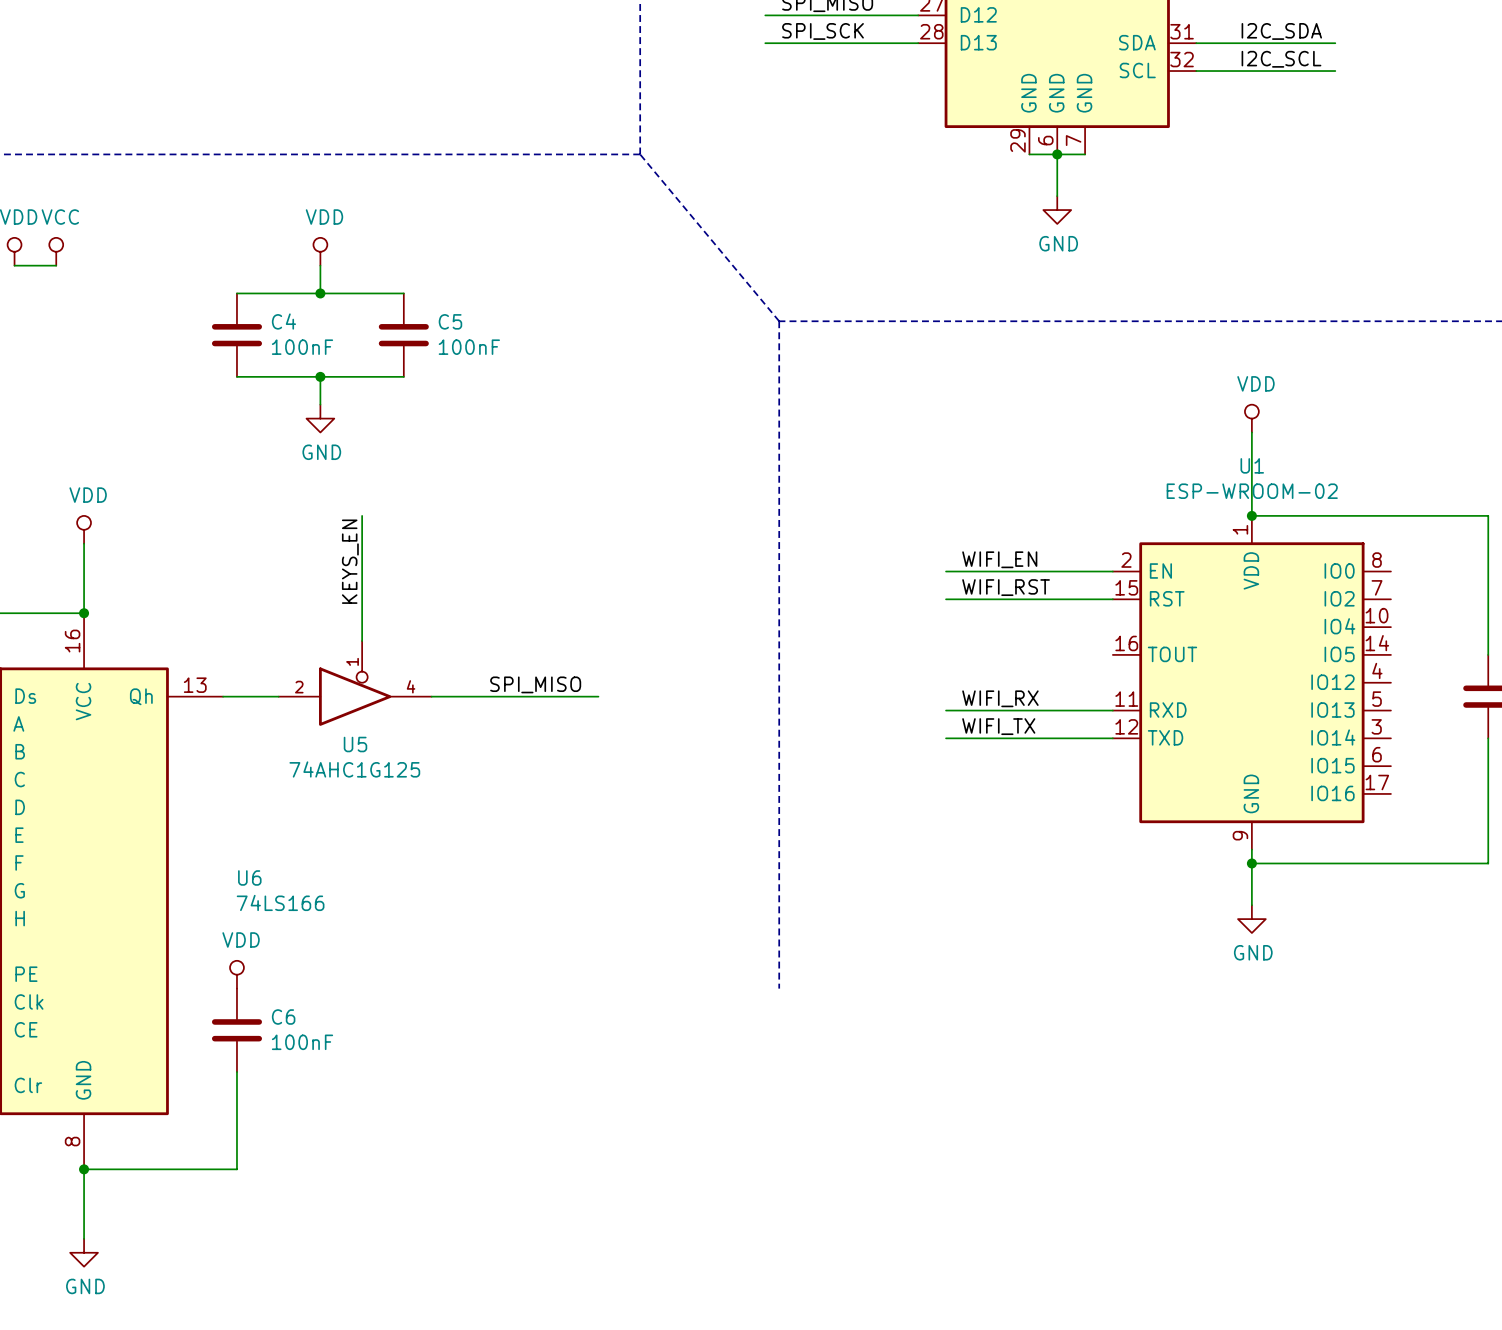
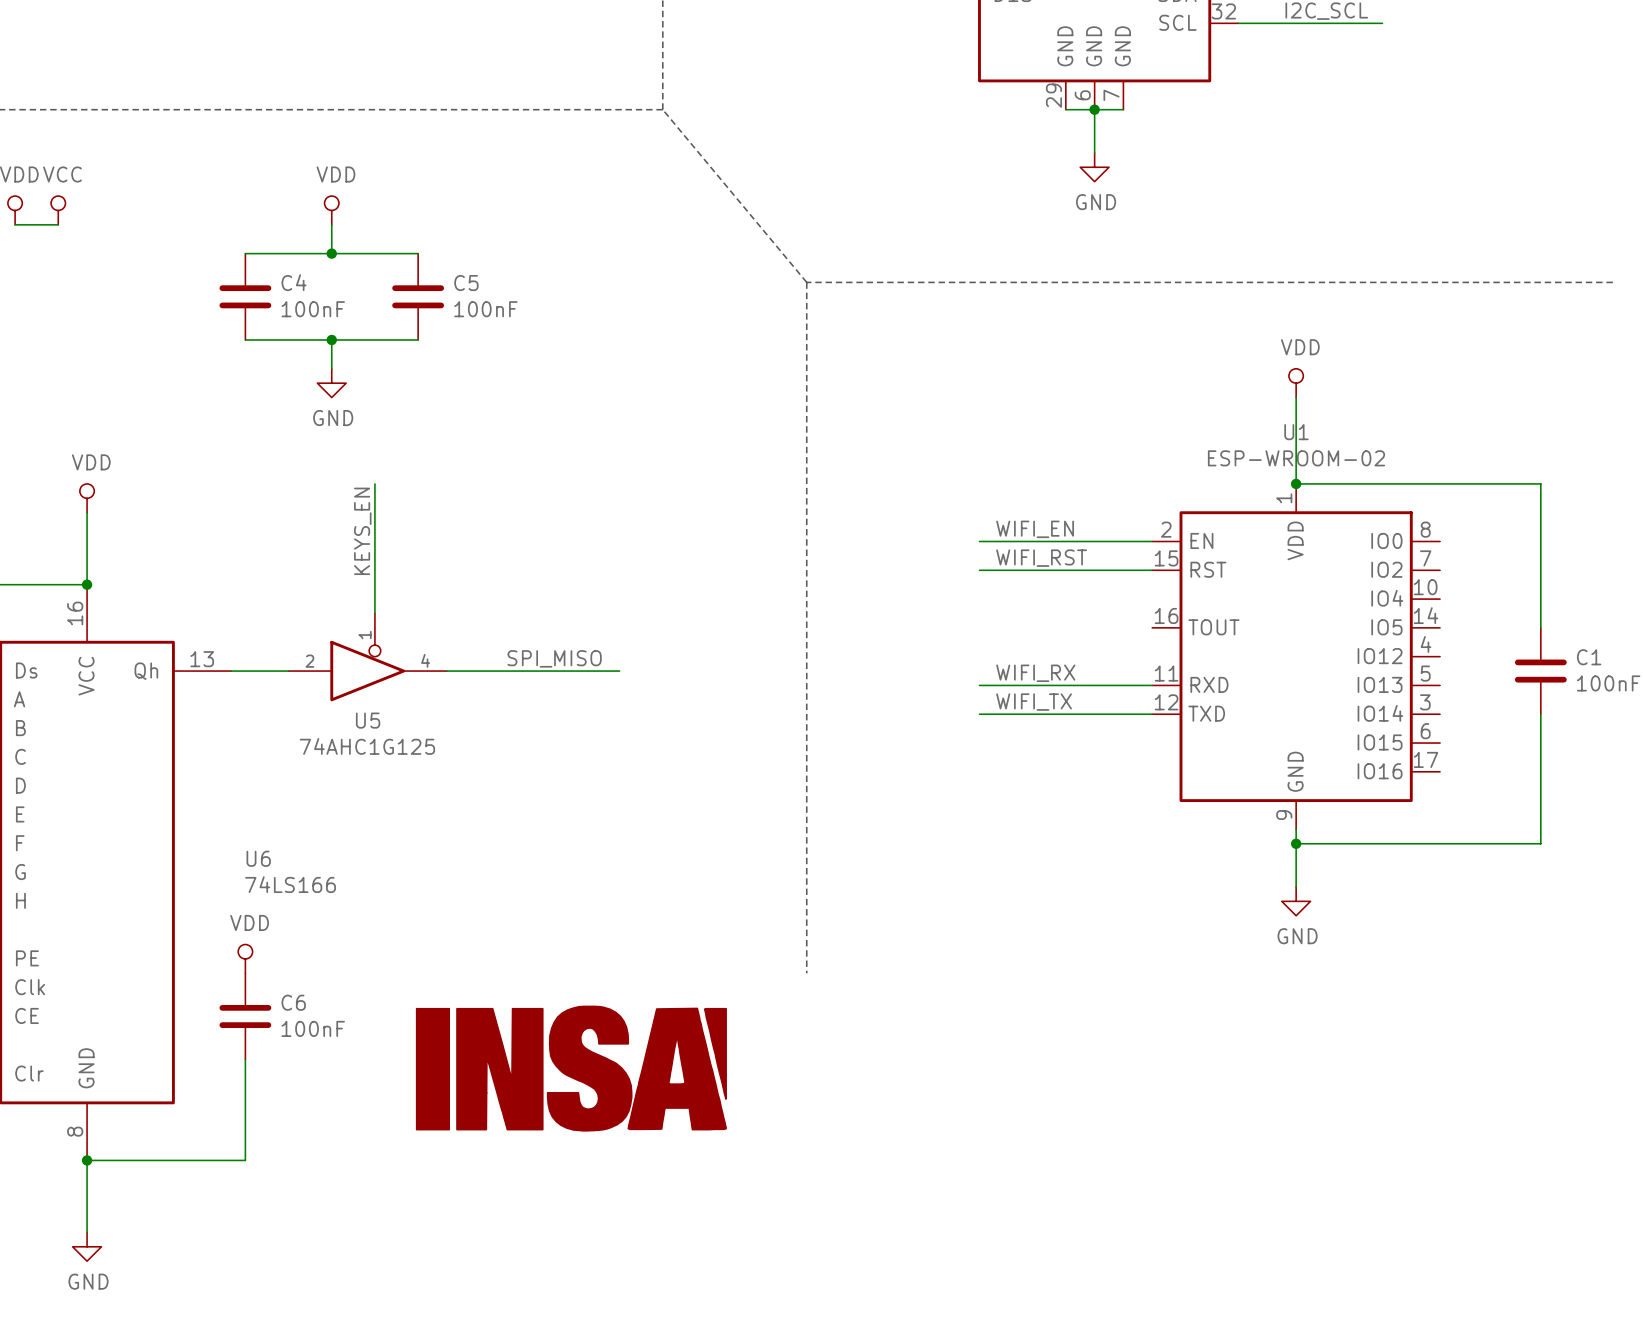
part: none -> (571, 1068)

